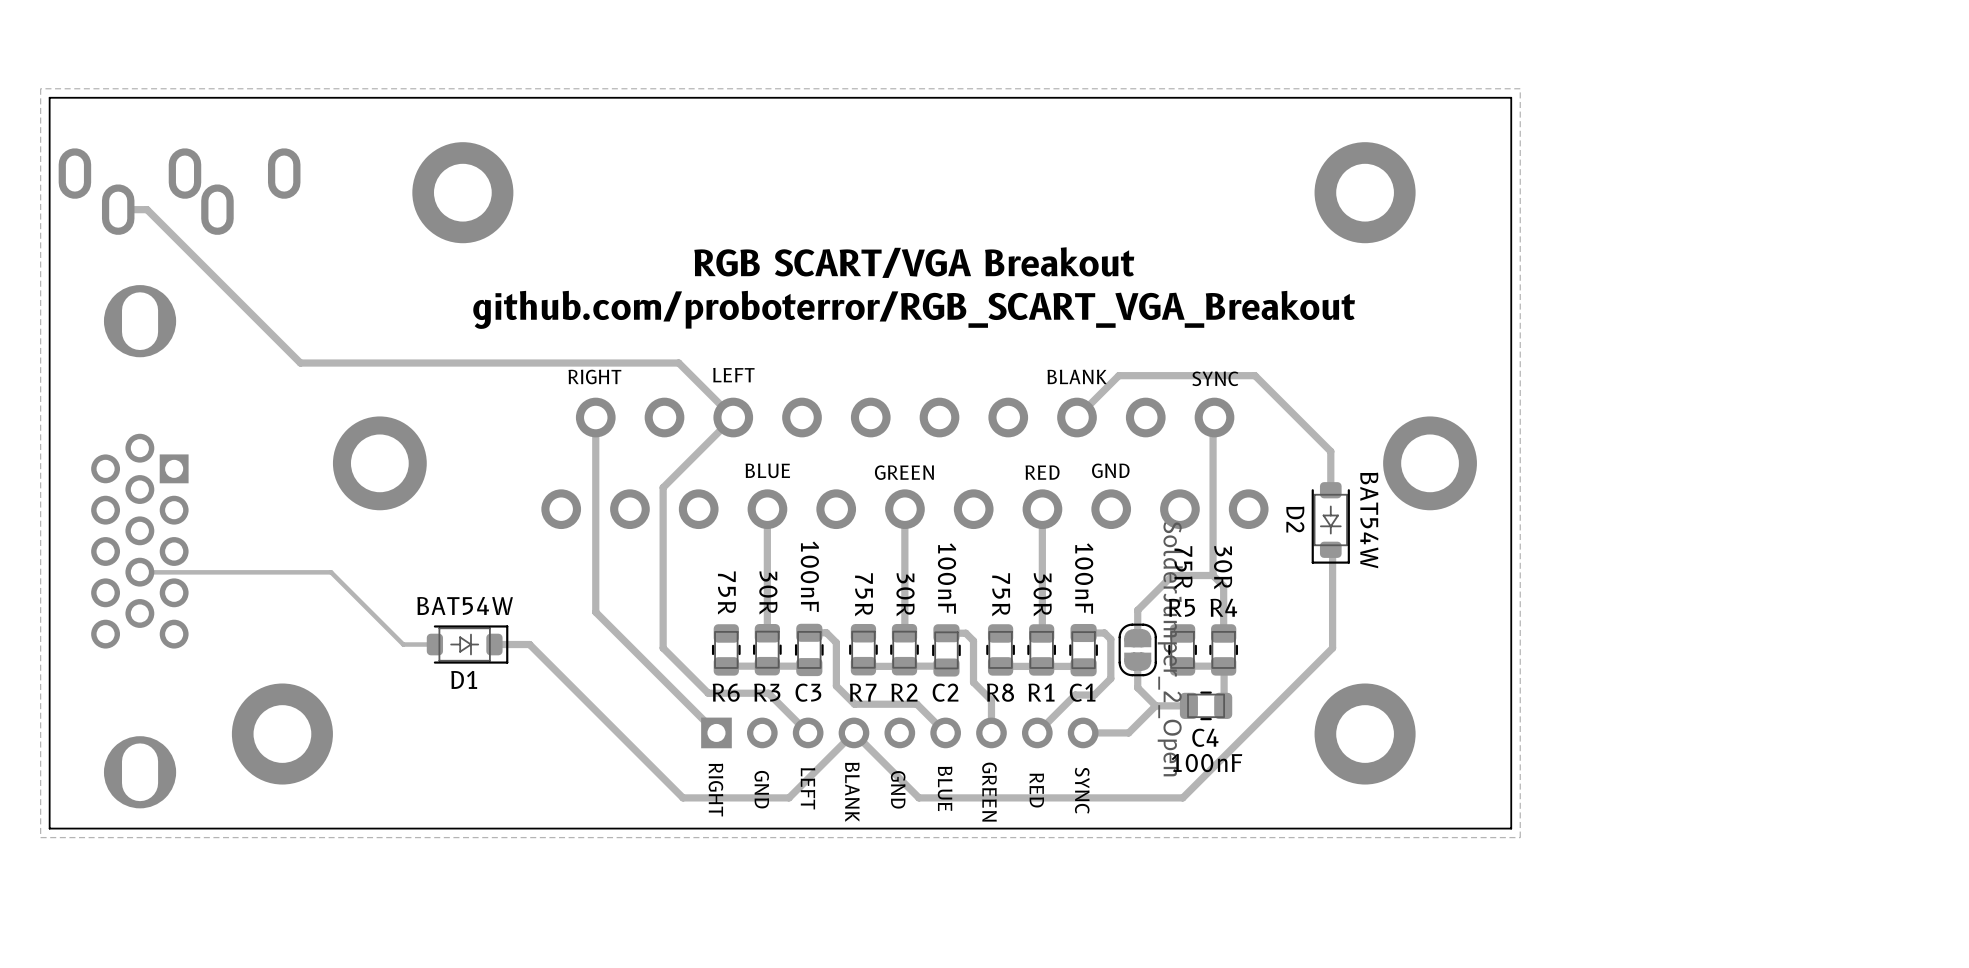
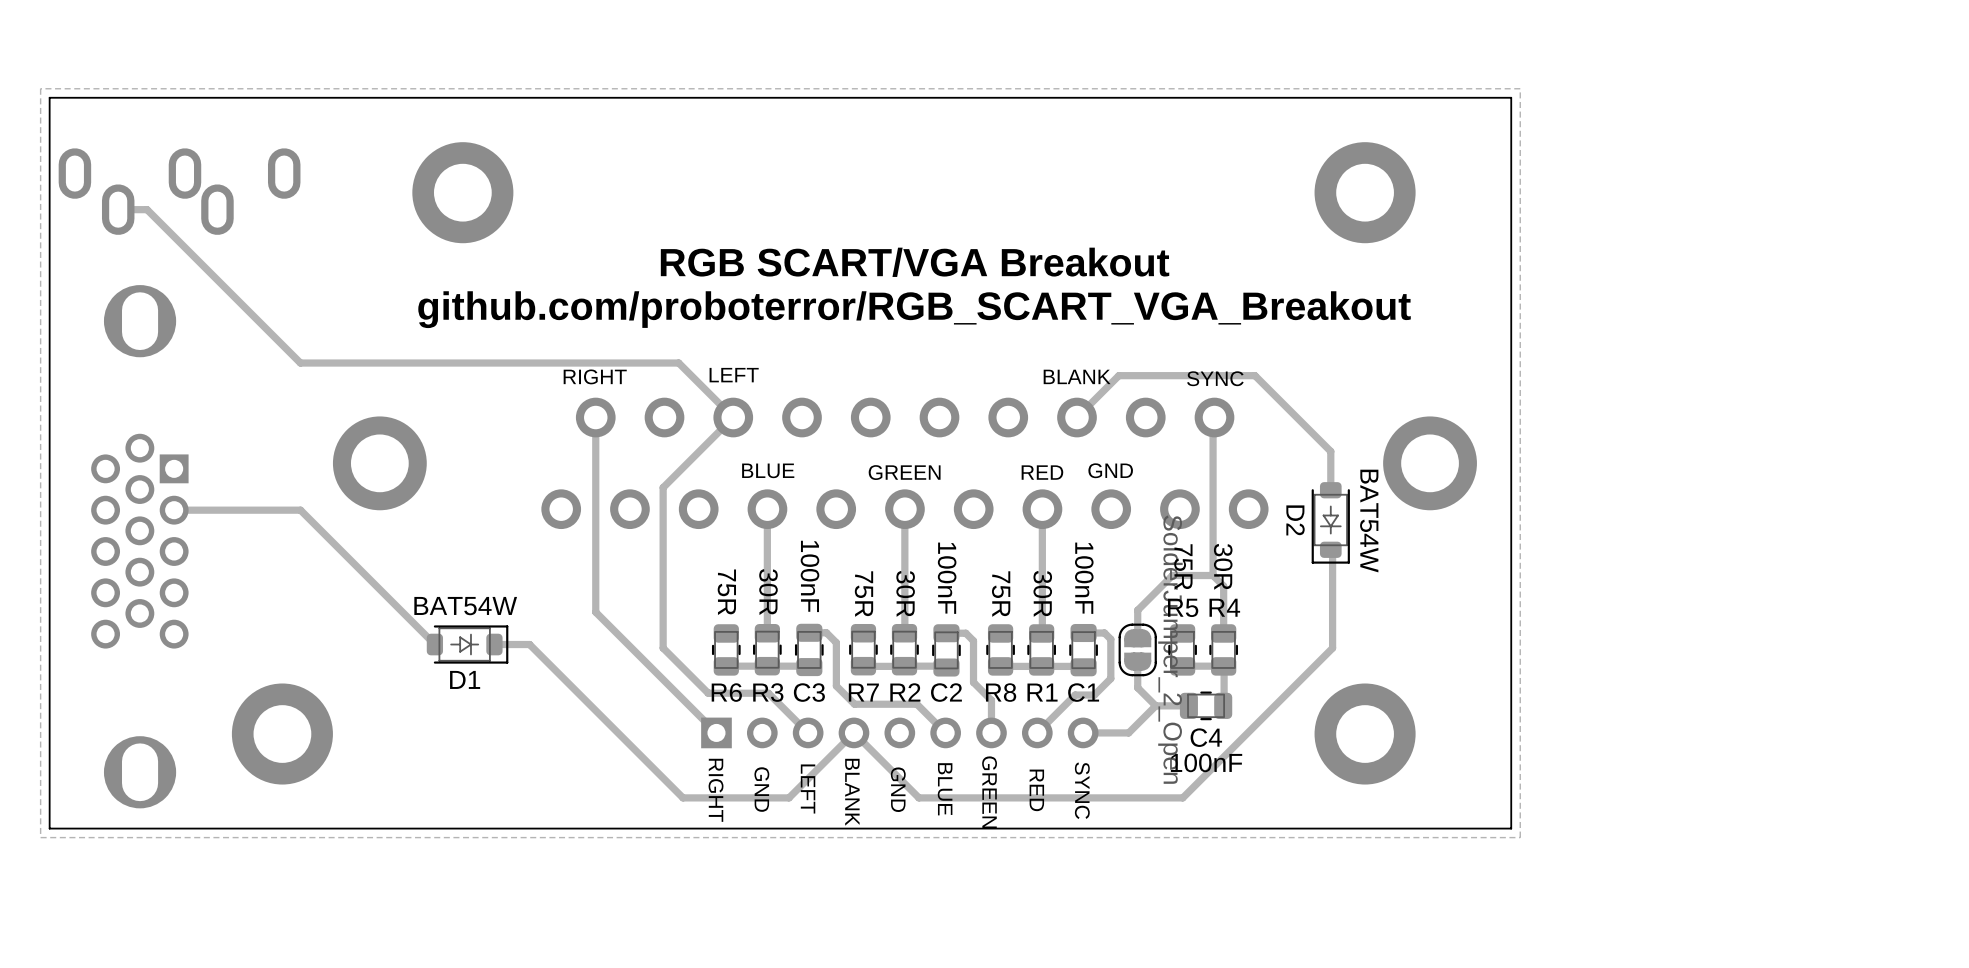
track: (140, 572) (331, 572) (403, 644) (434, 644) -> (174, 510) (300, 510) (434, 644)

